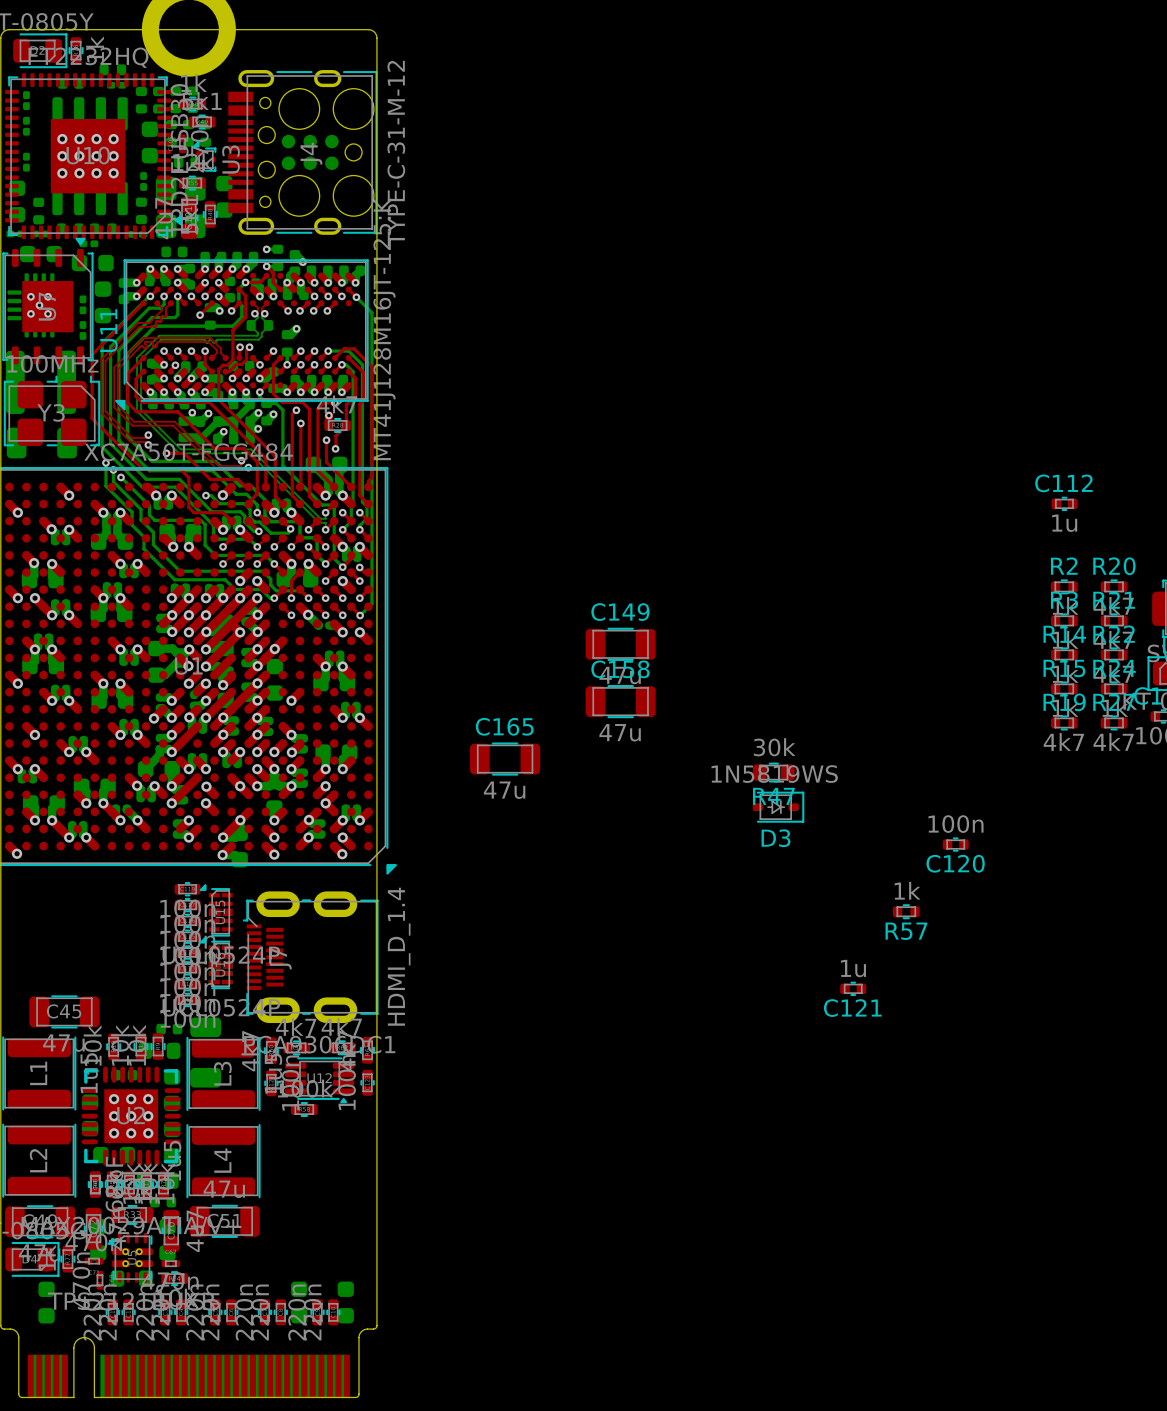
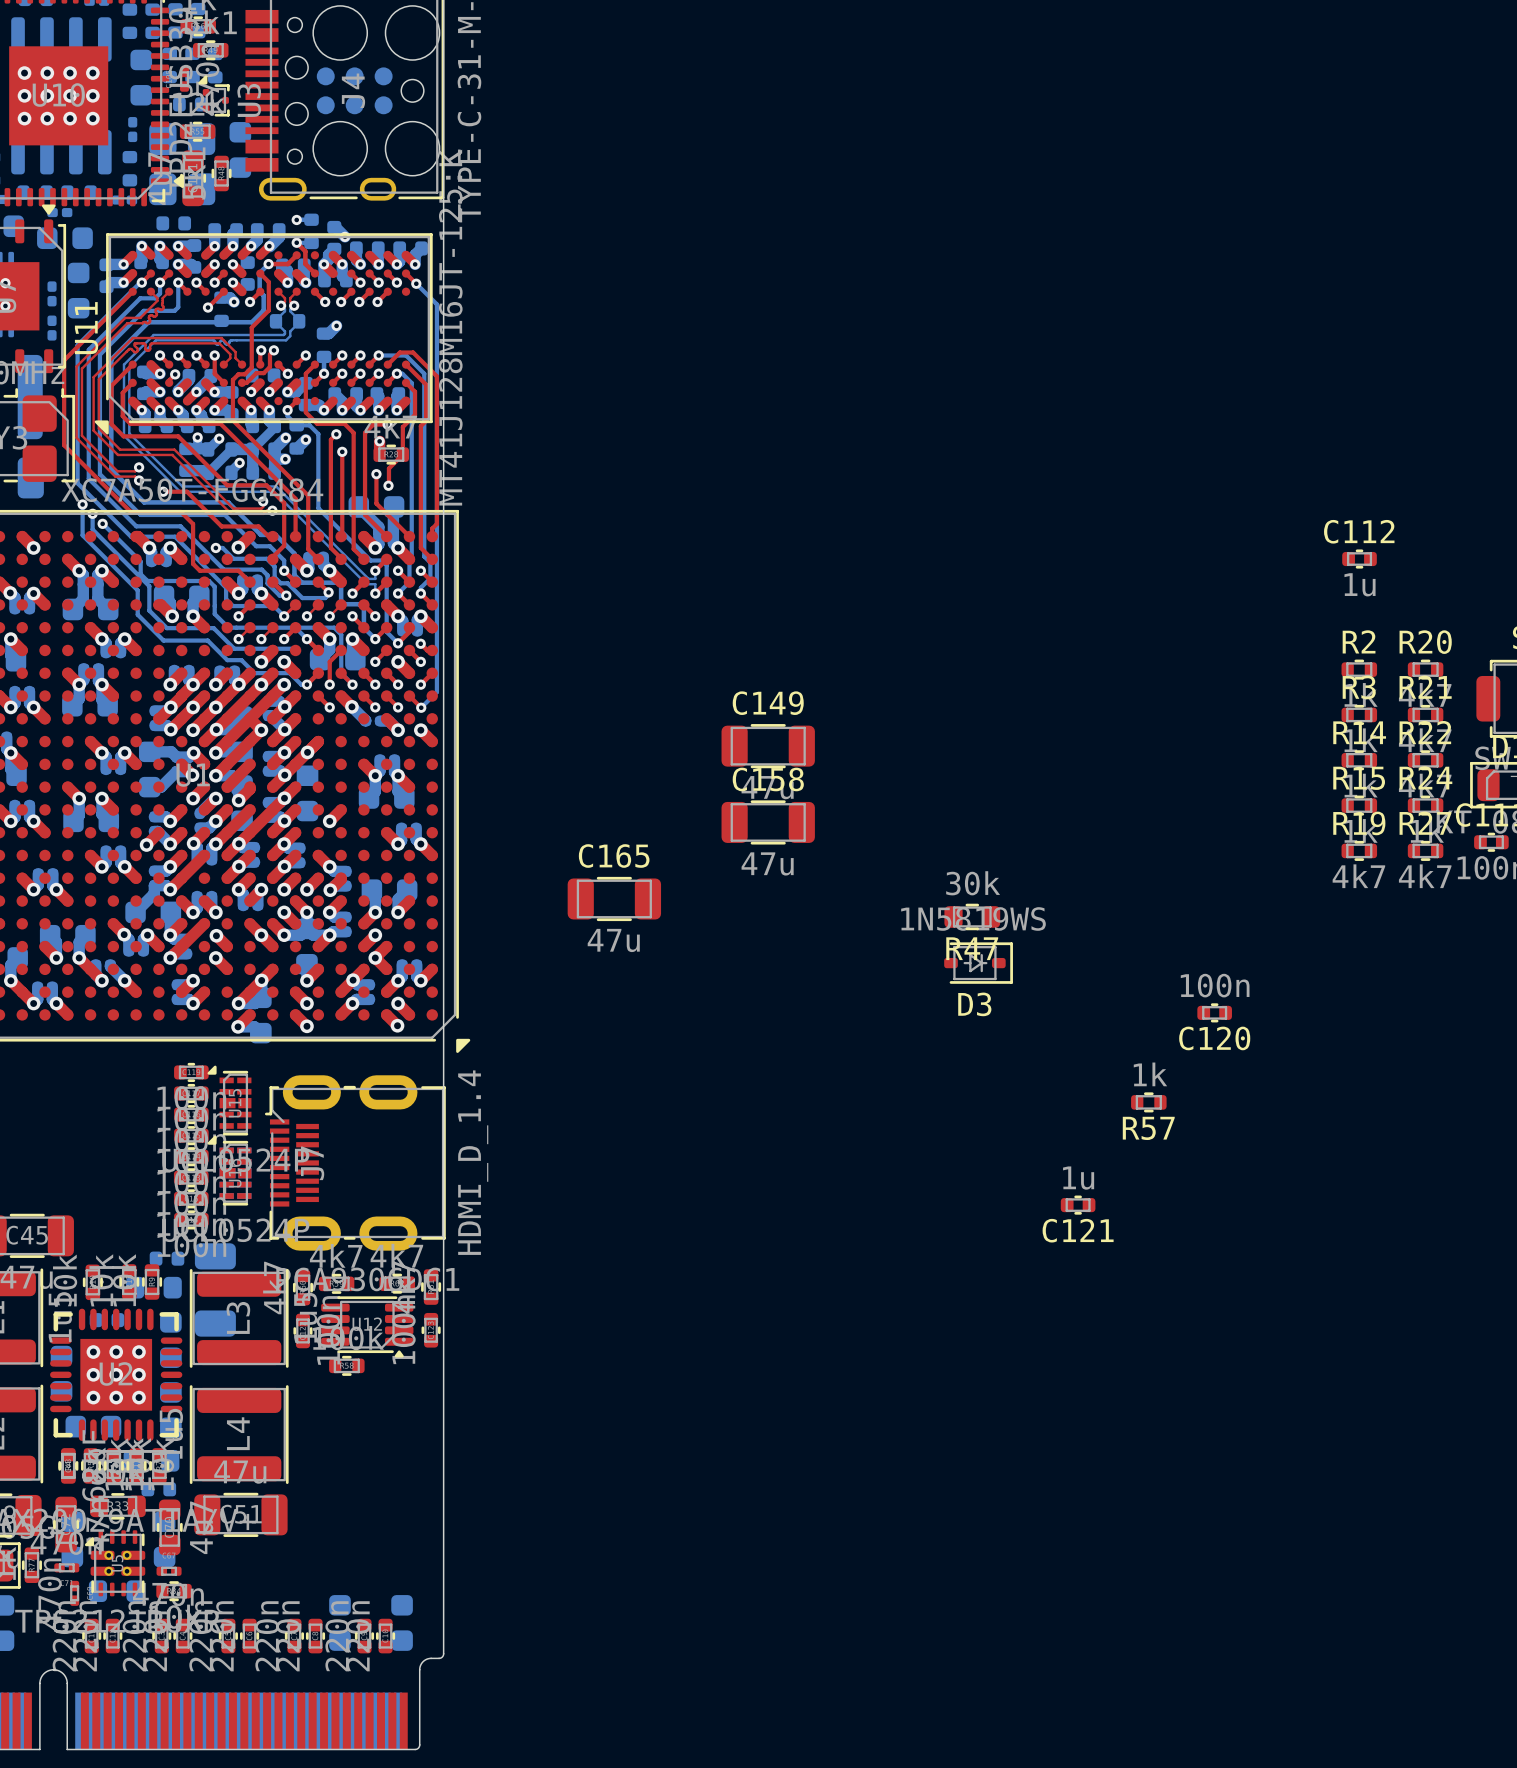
bottom track: (113, 481) (141, 509) (141, 519) (153, 532) (153, 544) (179, 571) (219, 571) -> (92, 529) (149, 586) (149, 610) (166, 628) (213, 628) (234, 648)
bottom track: (132, 512) (132, 525) (144, 537) (144, 549) (174, 579) (214, 579) -> (117, 570) (137, 590) (137, 614) (163, 640) (207, 640) (227, 660)
bottom track: (262, 571) (270, 579) (270, 585) (276, 590) (301, 590) (308, 598) -> (295, 627) (334, 627) (341, 634) (341, 673) (352, 684)

